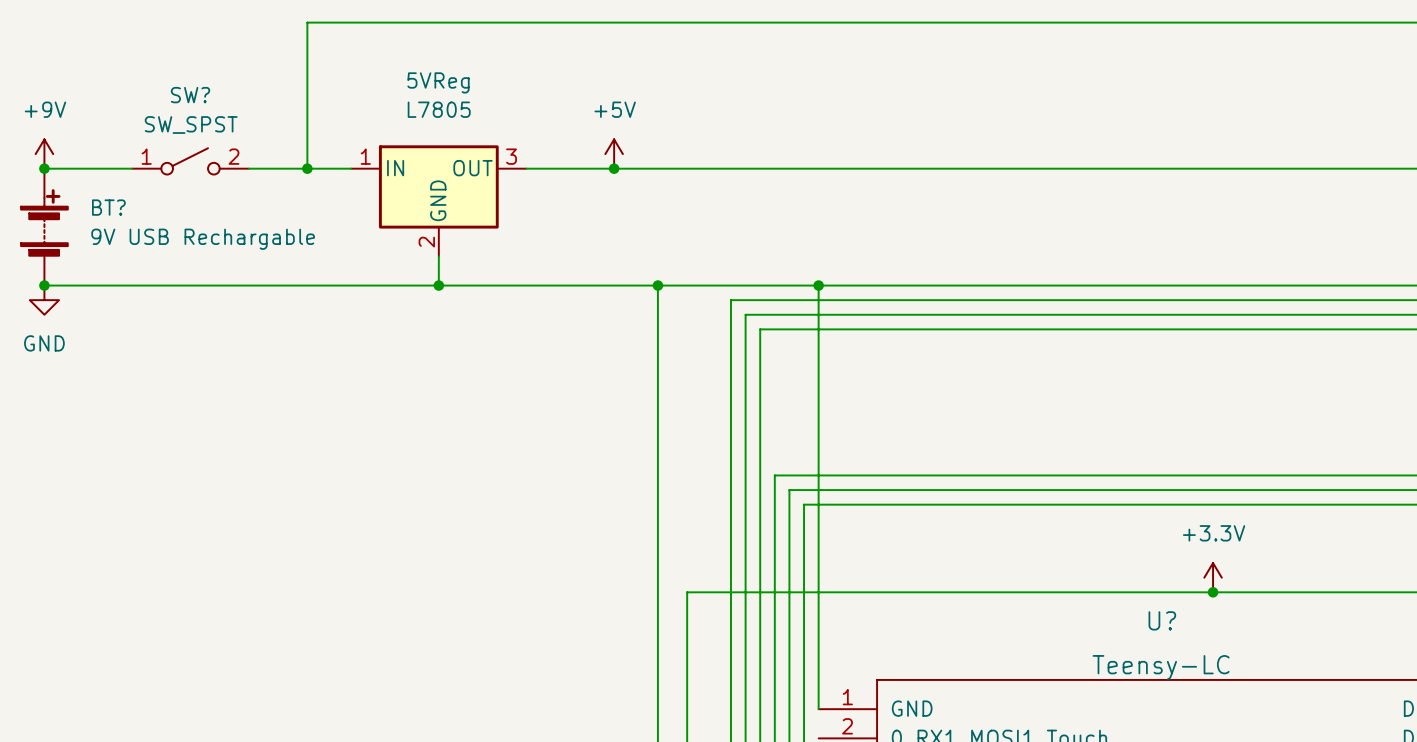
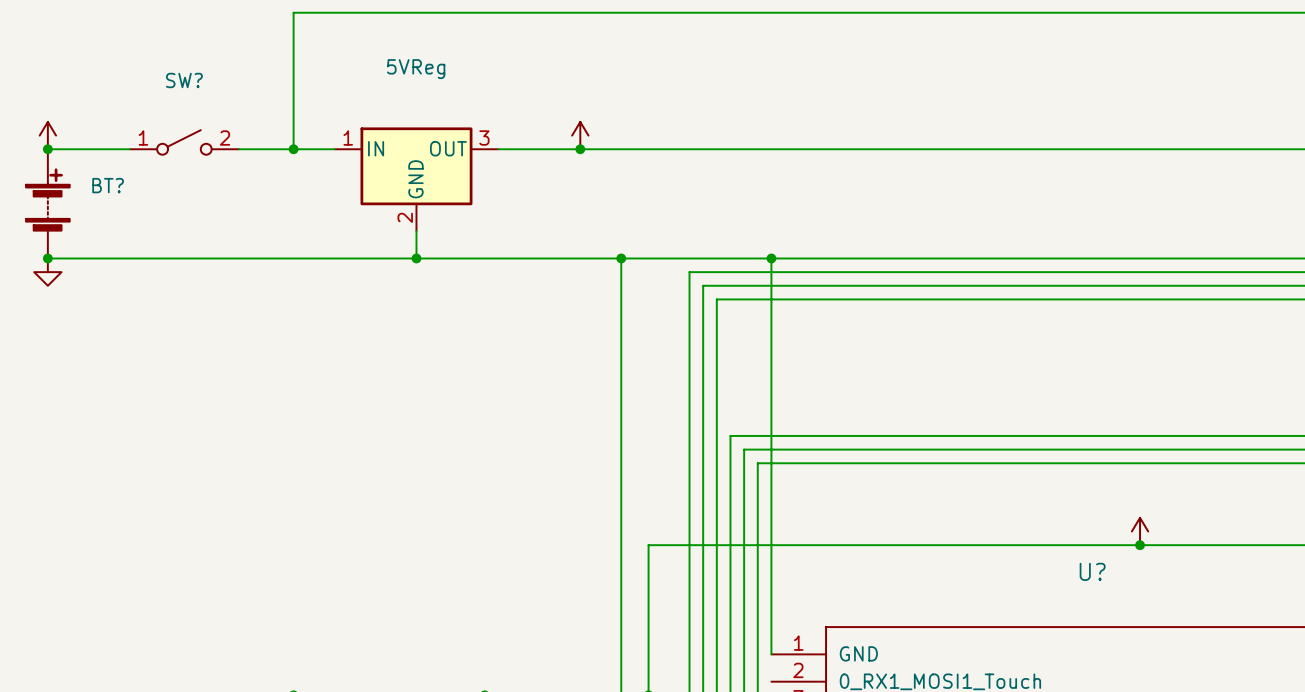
power symbol text: +9V (45, 109) -> none
5VReg value: L7805 (439, 109) -> none
power symbol text: +5V (615, 109) -> none
SW? value: SW_SPST (191, 125) -> none
BT? value: 9V USB Rechargable (203, 239) -> none
power symbol text: GND (44, 343) -> none
power symbol text: +3.3V (1214, 533) -> none
U? value: Teensy-LC (1161, 667) -> none

